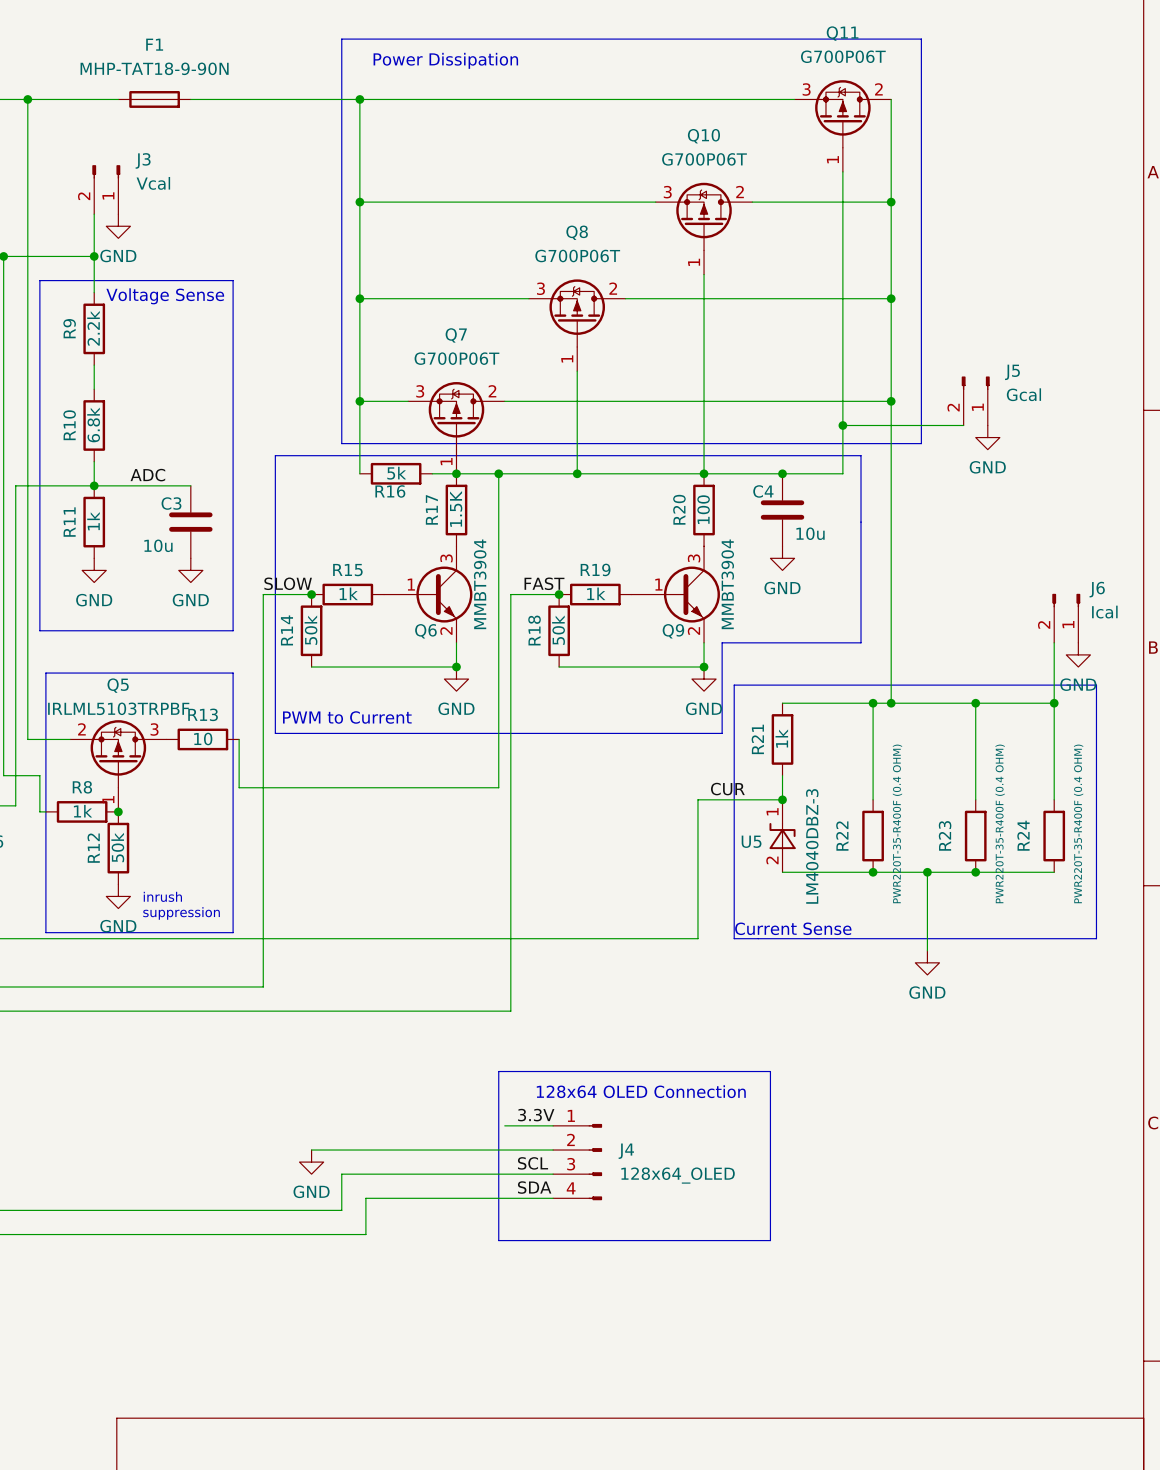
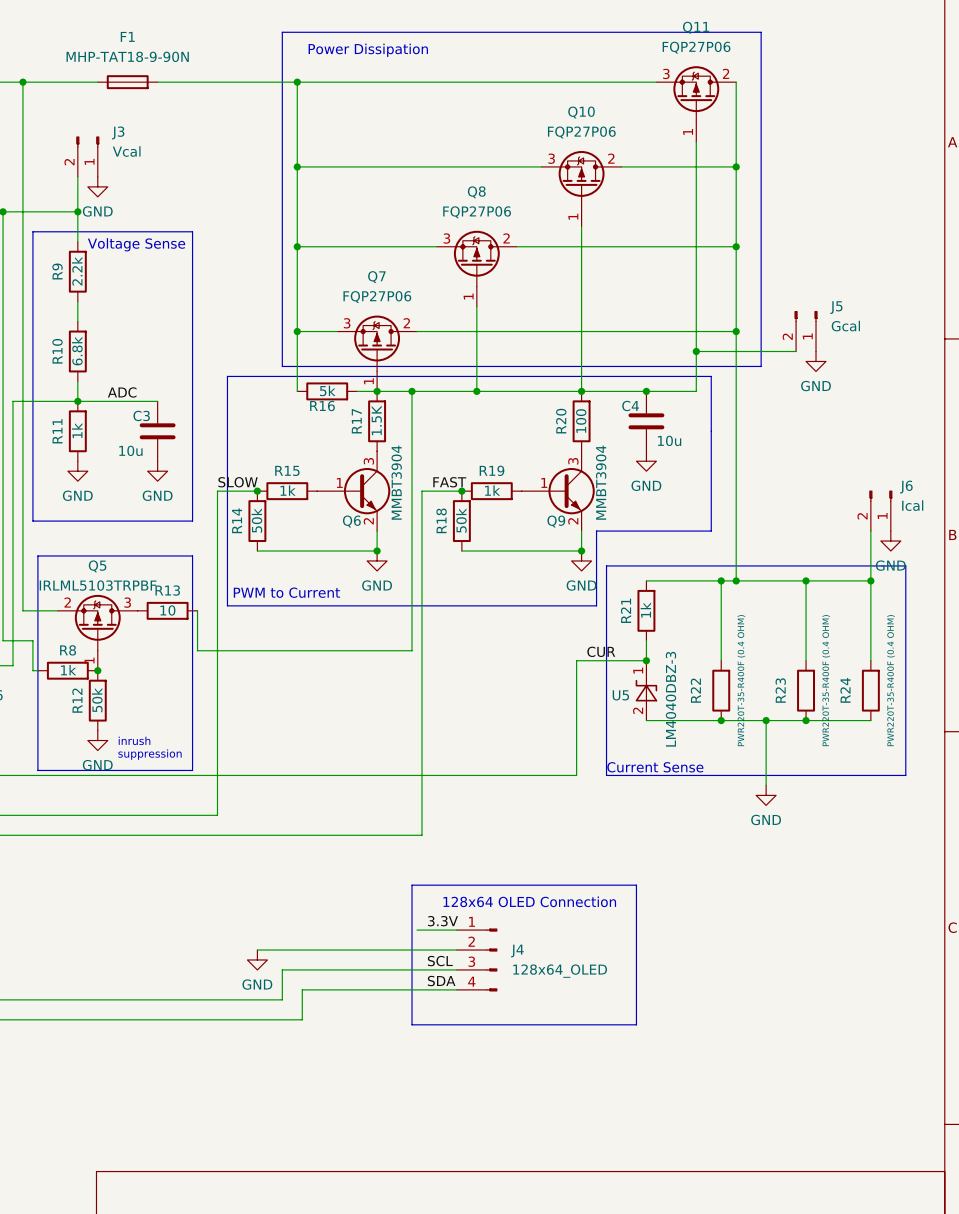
Q11 value: G700P06T (843, 56) -> FQP27P06 (696, 47)
Q10 value: G700P06T (704, 159) -> FQP27P06 (581, 132)
Q8 value: G700P06T (577, 255) -> FQP27P06 (477, 212)
Q7 value: G700P06T (456, 358) -> FQP27P06 (377, 297)

